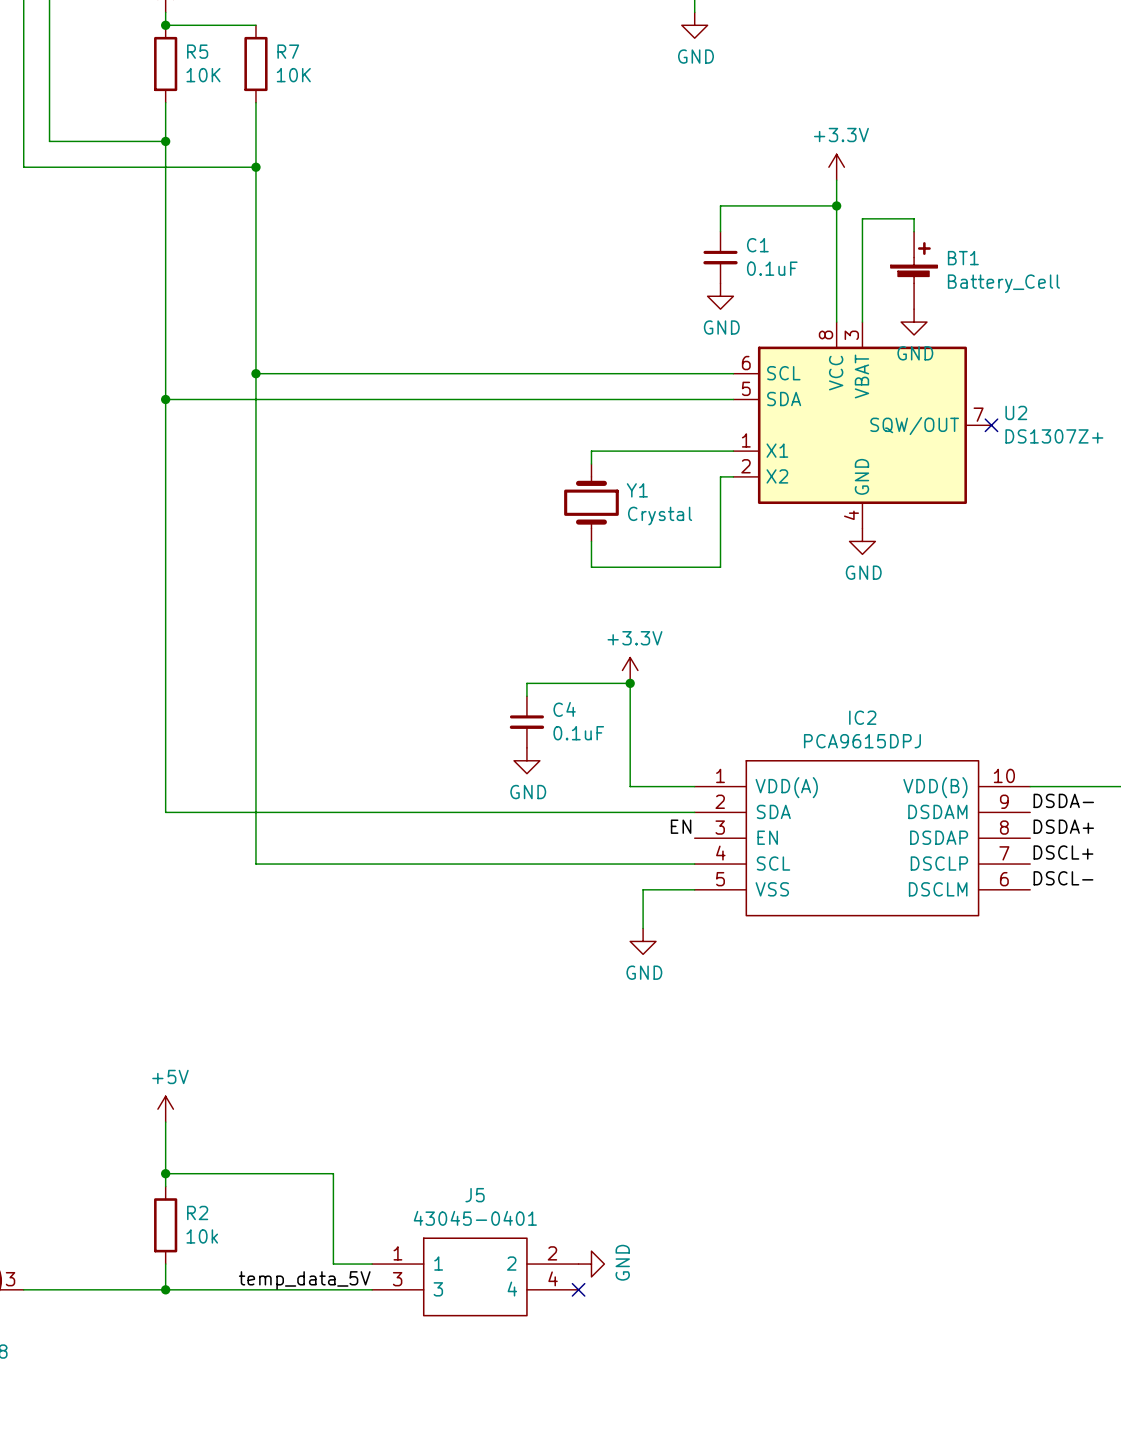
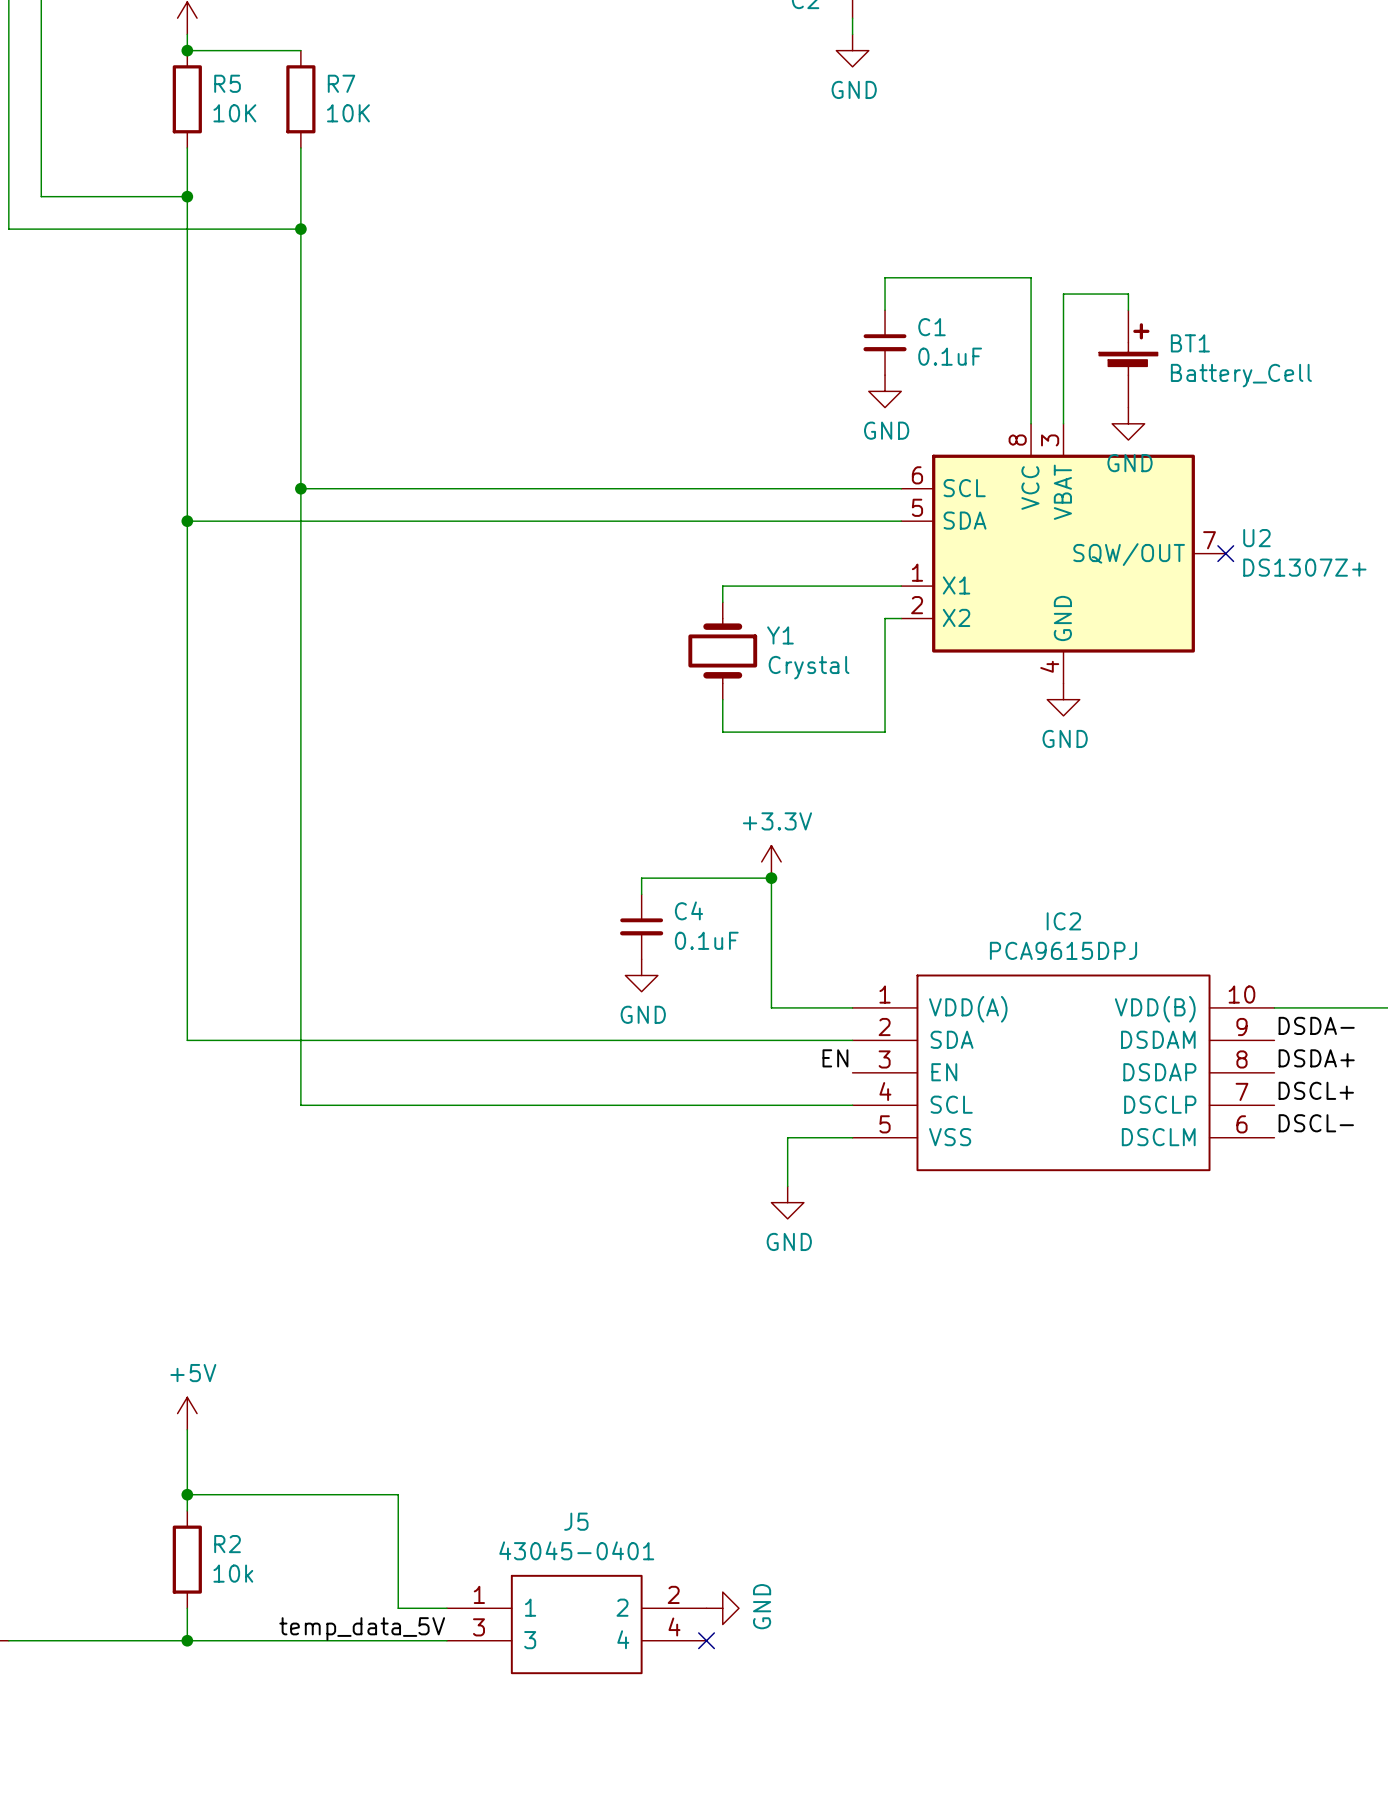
power symbol: +3.3V (836, 167) -> none
wire: (836, 180) (836, 205) -> none
junction: (836, 205) -> none

